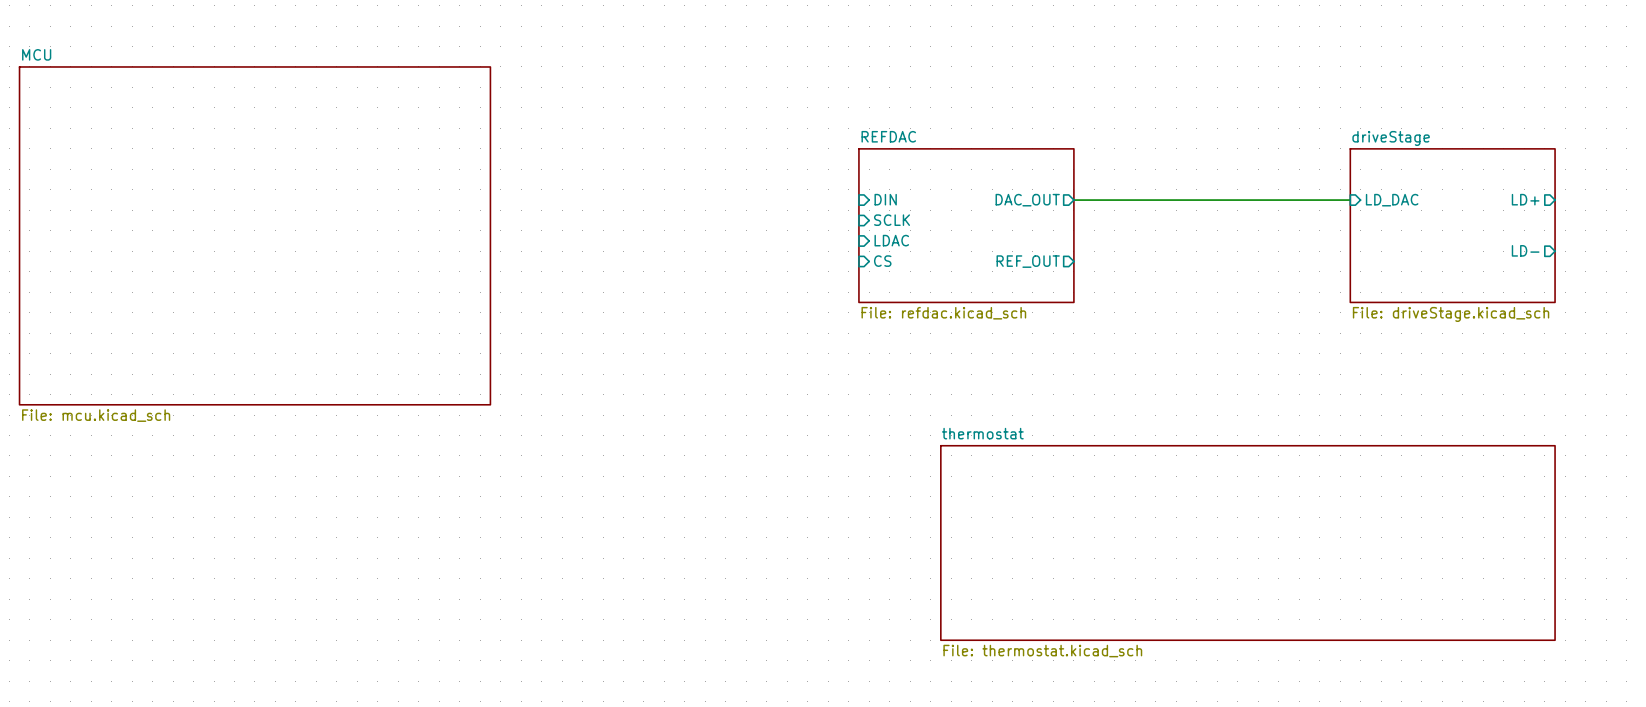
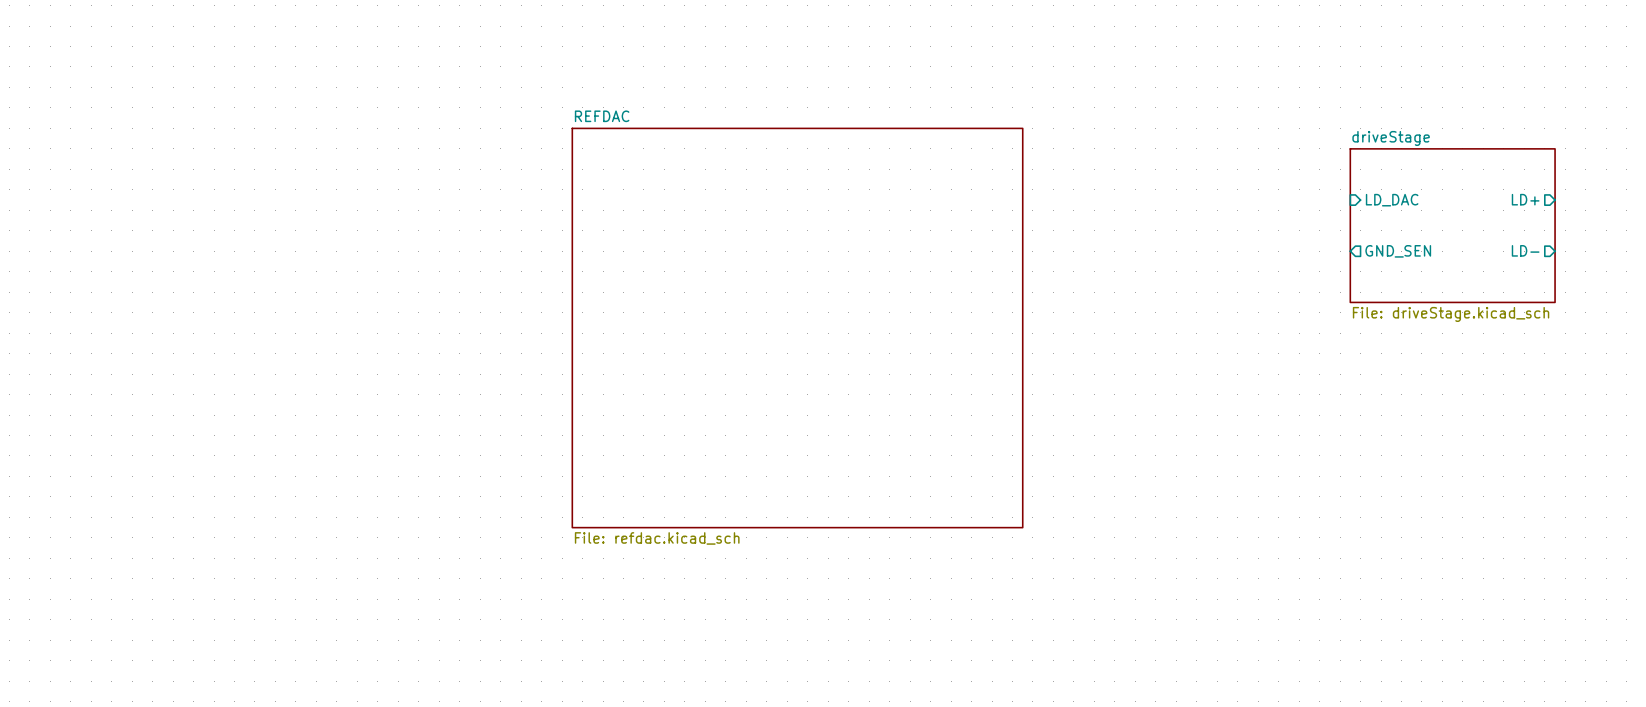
sheet pin: DIN (885, 199) -> none
sheet pin: DAC_OUT (1027, 200) -> none
wire: (1073, 200) (1350, 200) -> none
sheet pin: SCLK (892, 220) -> none
sheet REFDAC: File: refdac.kicad_sch (966, 225) -> none
sheet MCU: File: mcu.kicad_sch (254, 235) -> none
sheet pin: LDAC (891, 240) -> none
sheet pin: none -> GND_SEN (1398, 251)
sheet pin: CS (882, 261) -> none
sheet pin: REF_OUT (1028, 261) -> none
sheet REFDAC: none -> File: refdac.kicad_sch (797, 328)
sheet thermostat: File: thermostat.kicad_sch (1247, 542) -> none

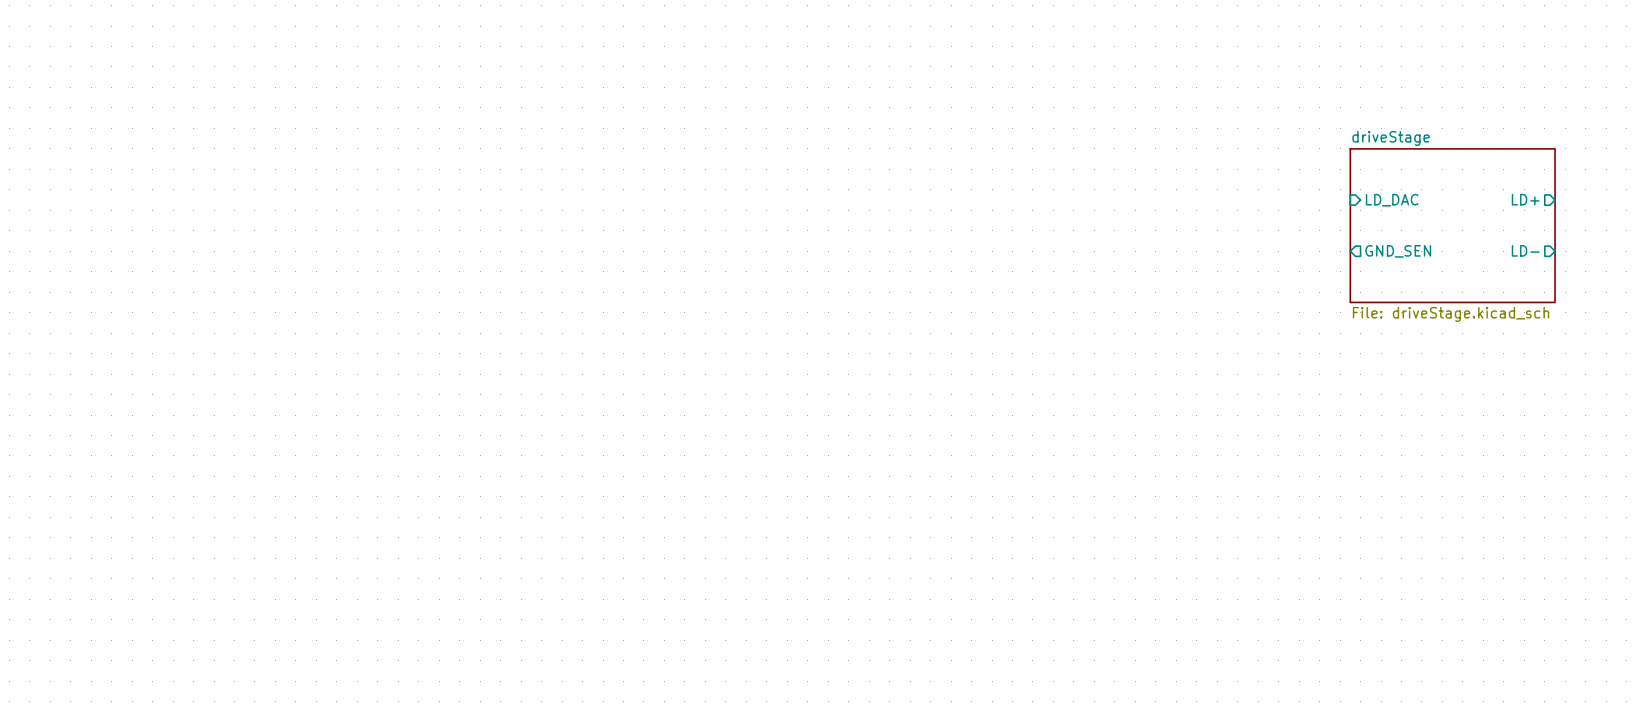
sheet REFDAC: File: refdac.kicad_sch (797, 328) -> none

